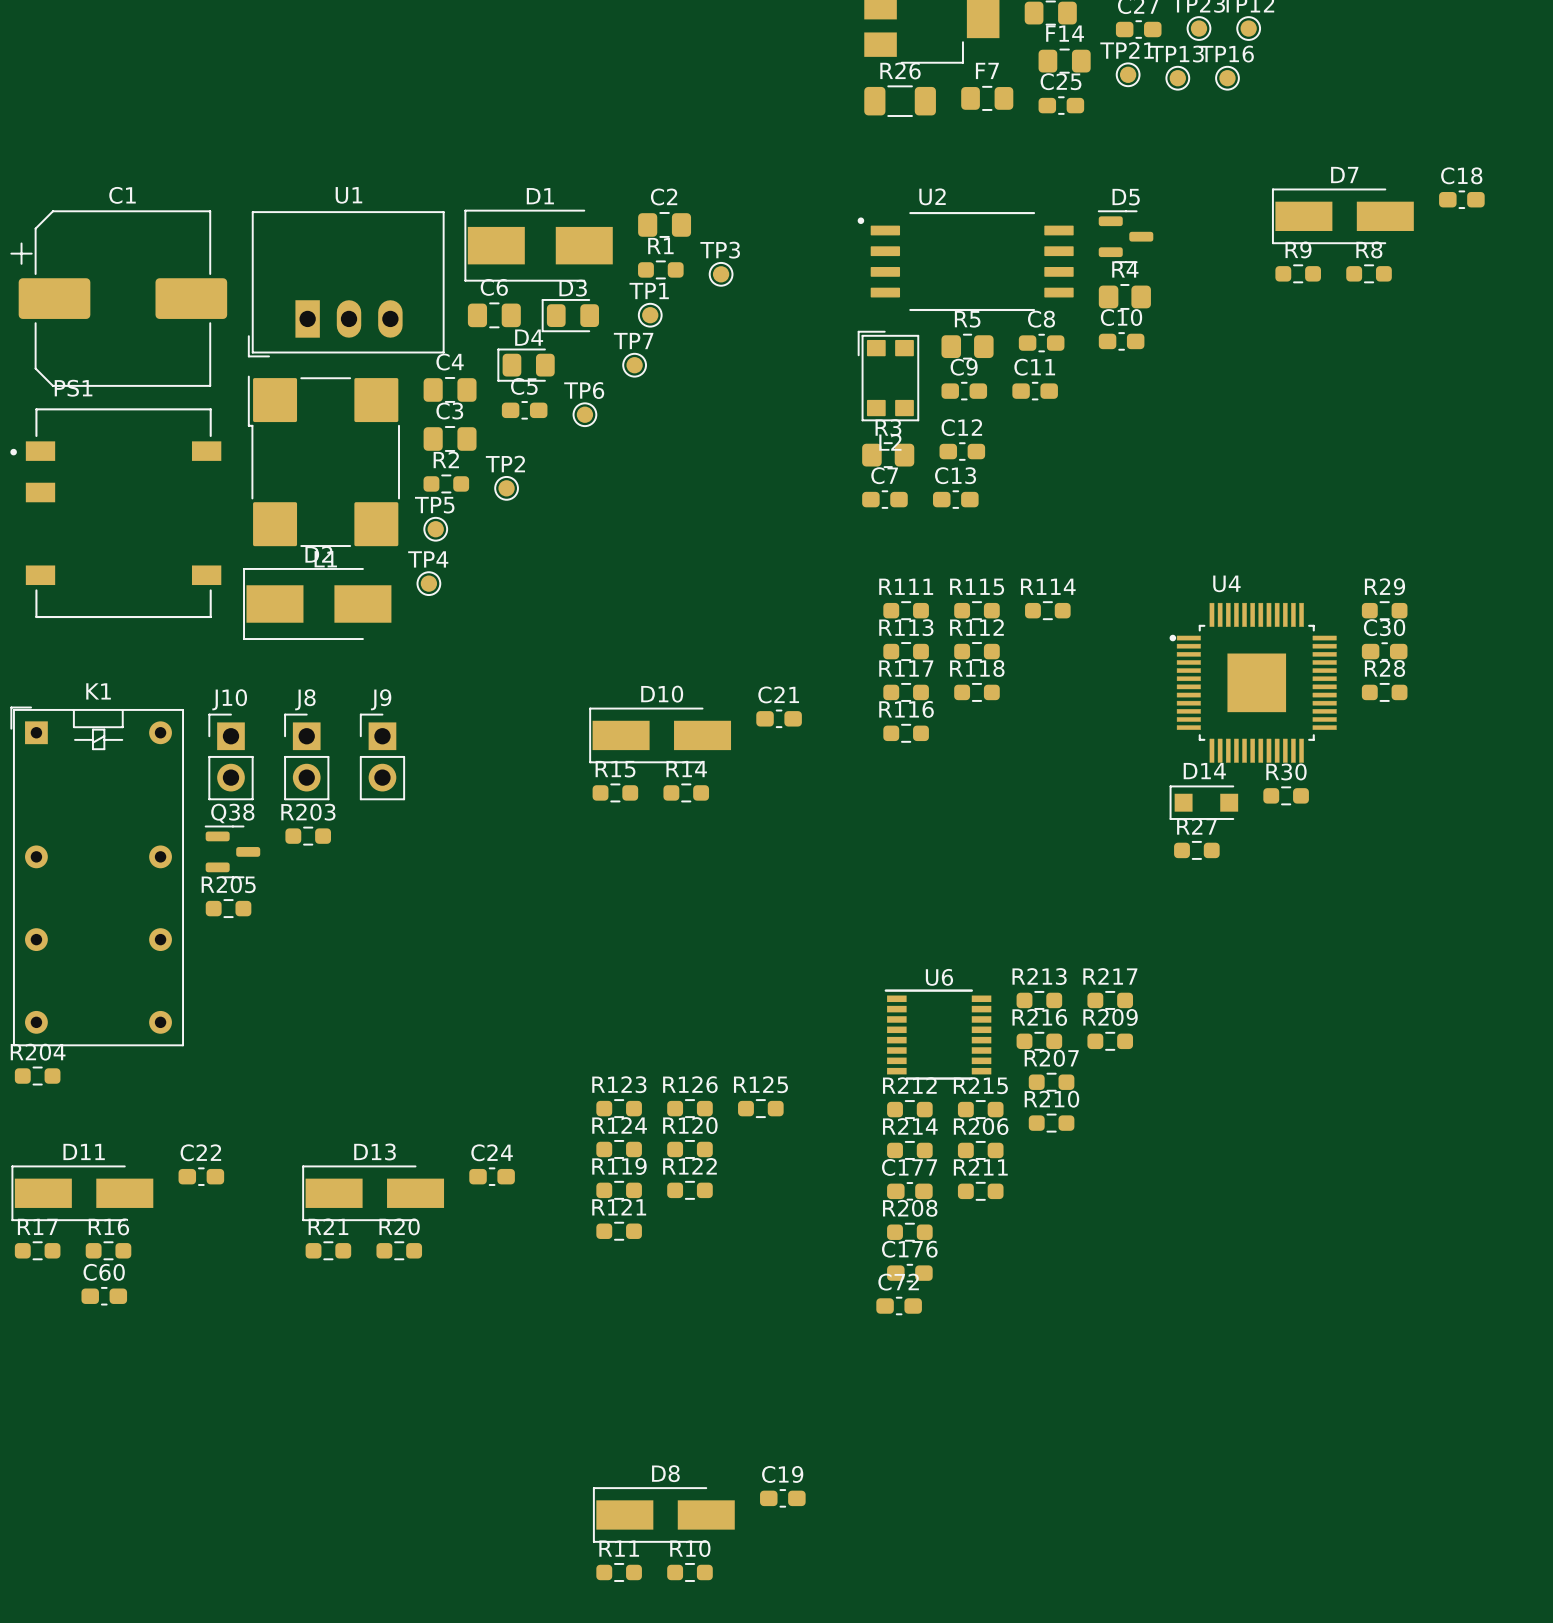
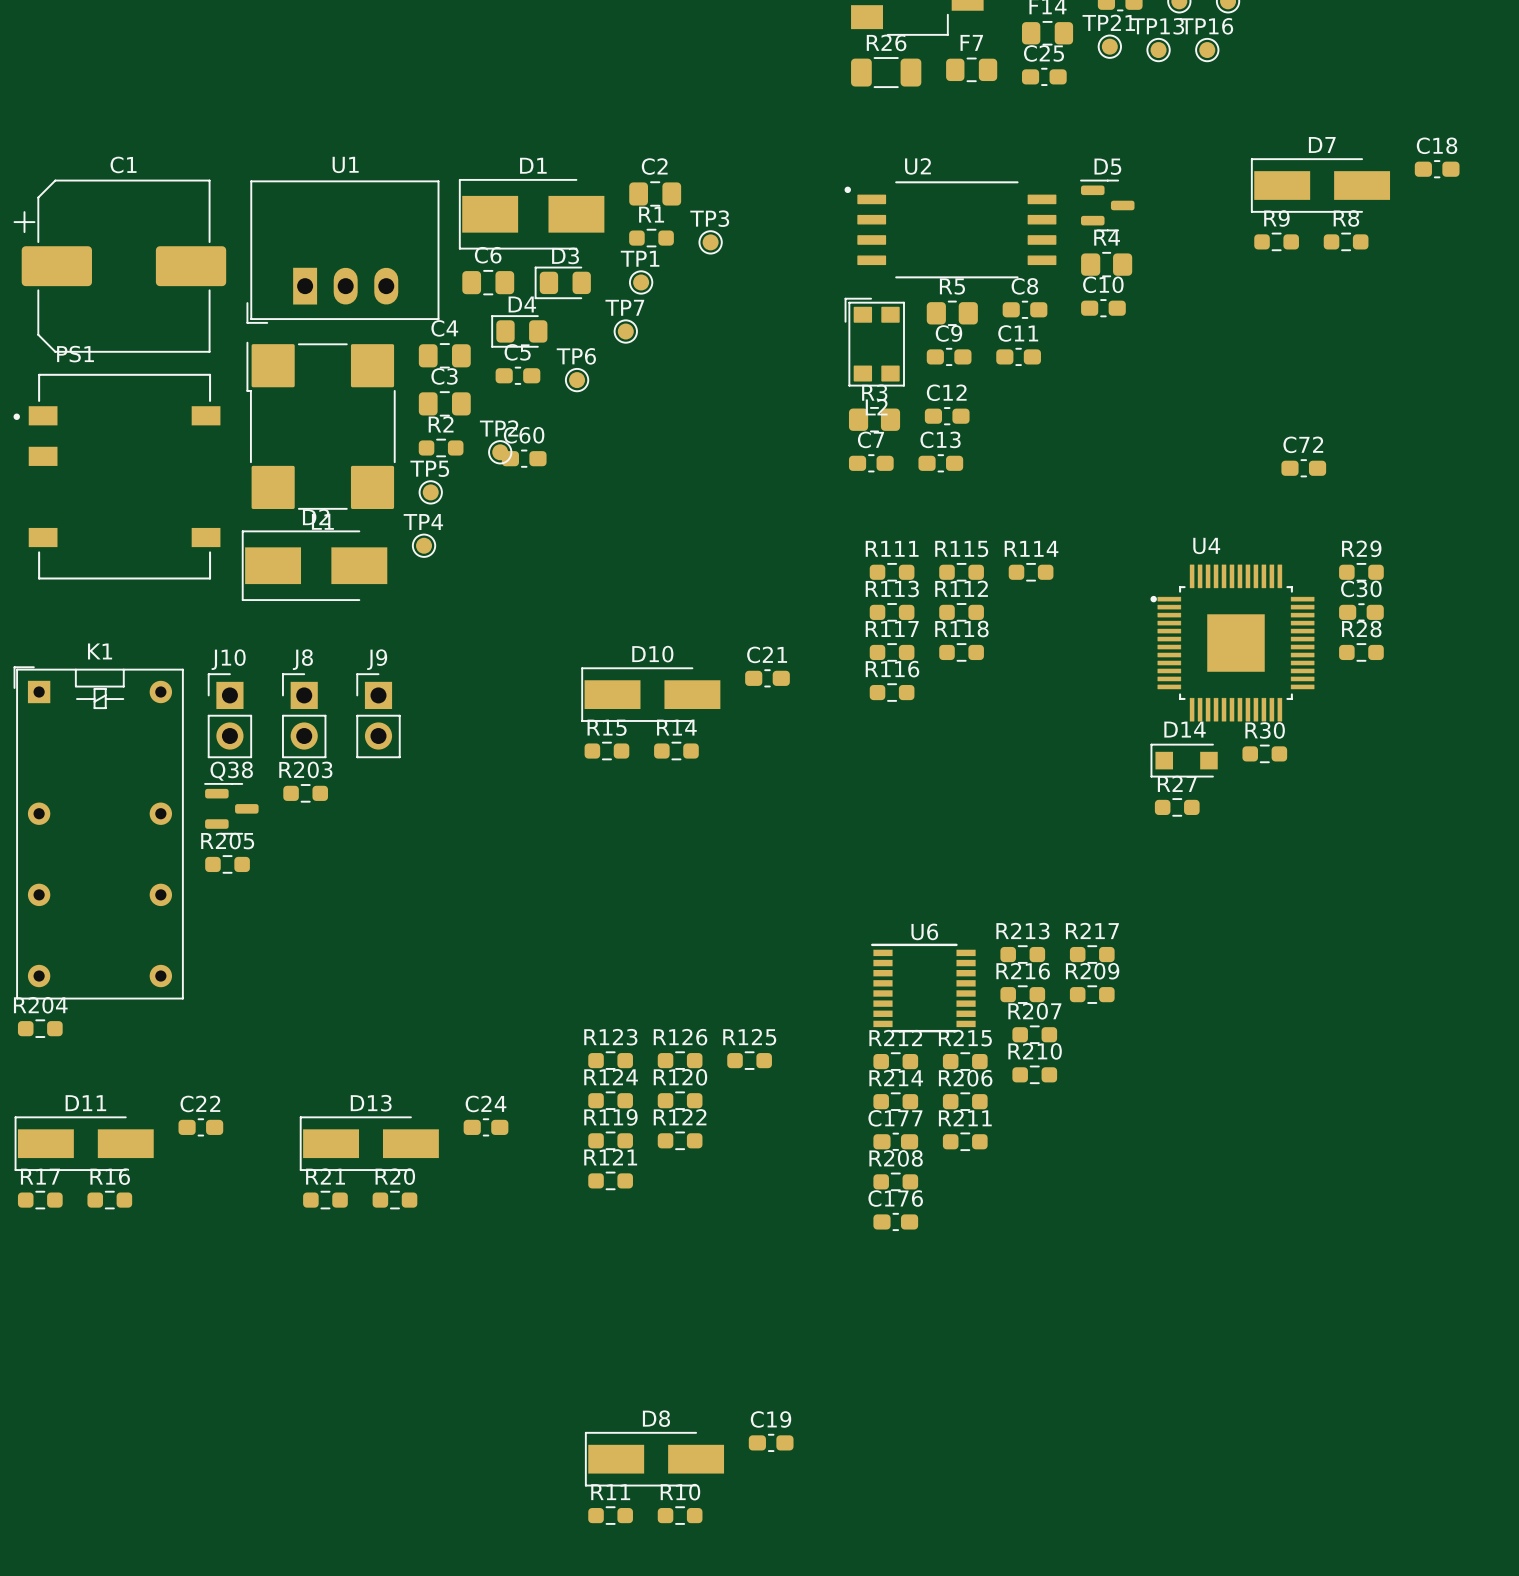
C60 position: (104, 1296) -> (524, 458)
C72 position: (899, 1306) -> (1303, 468)

